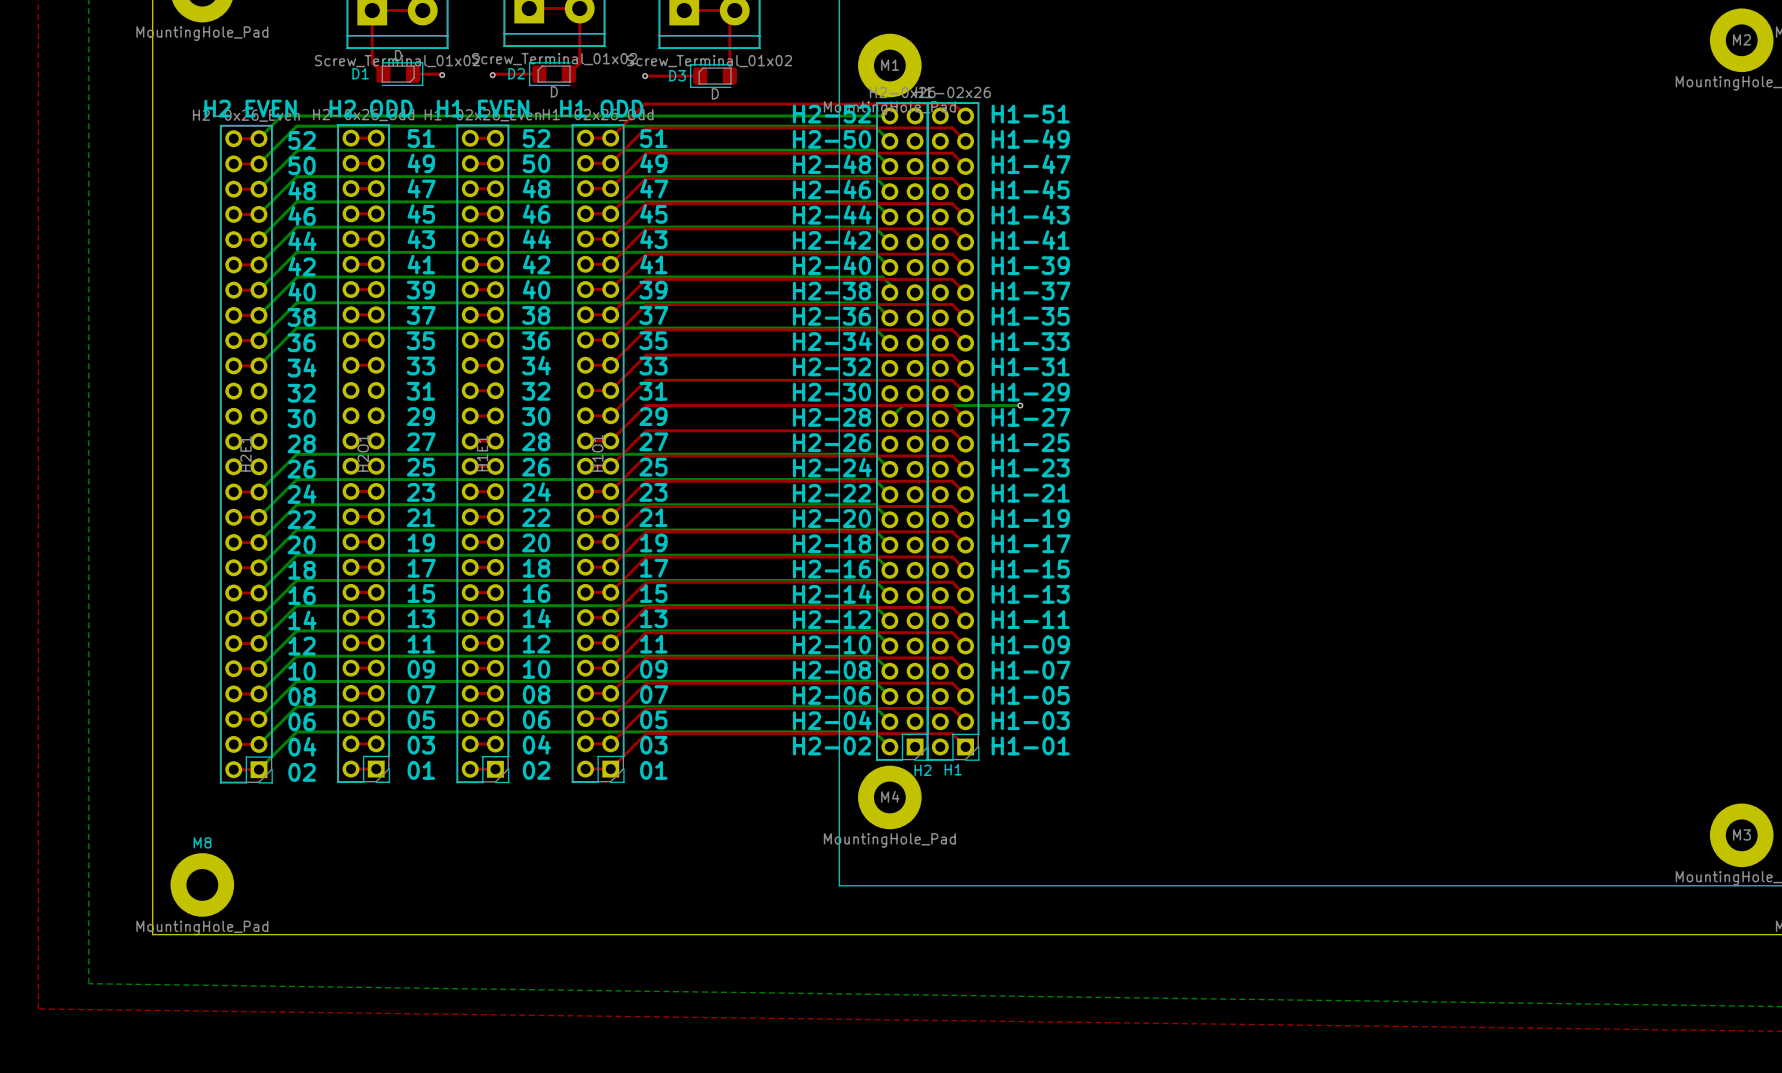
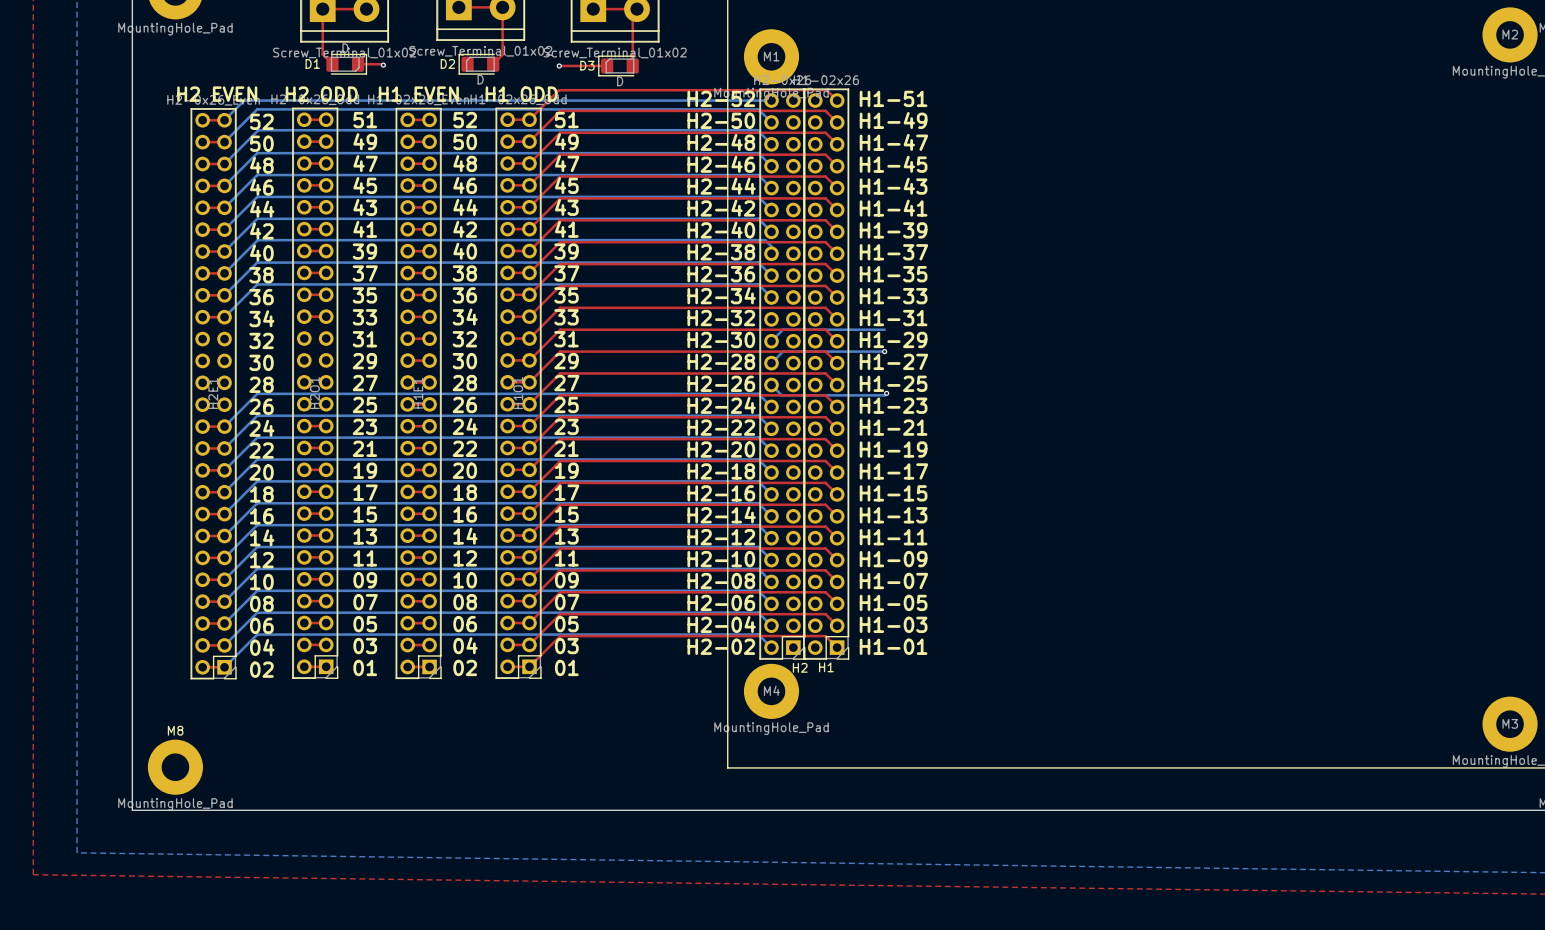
top track: (539, 74) (492, 75) -> none
via: (492, 75) -> none
bottom track: none -> (884, 329) (783, 329) (771, 341)
bottom track: none -> (771, 385) (781, 395) (884, 395) (886, 393)
via: none -> (886, 393)

